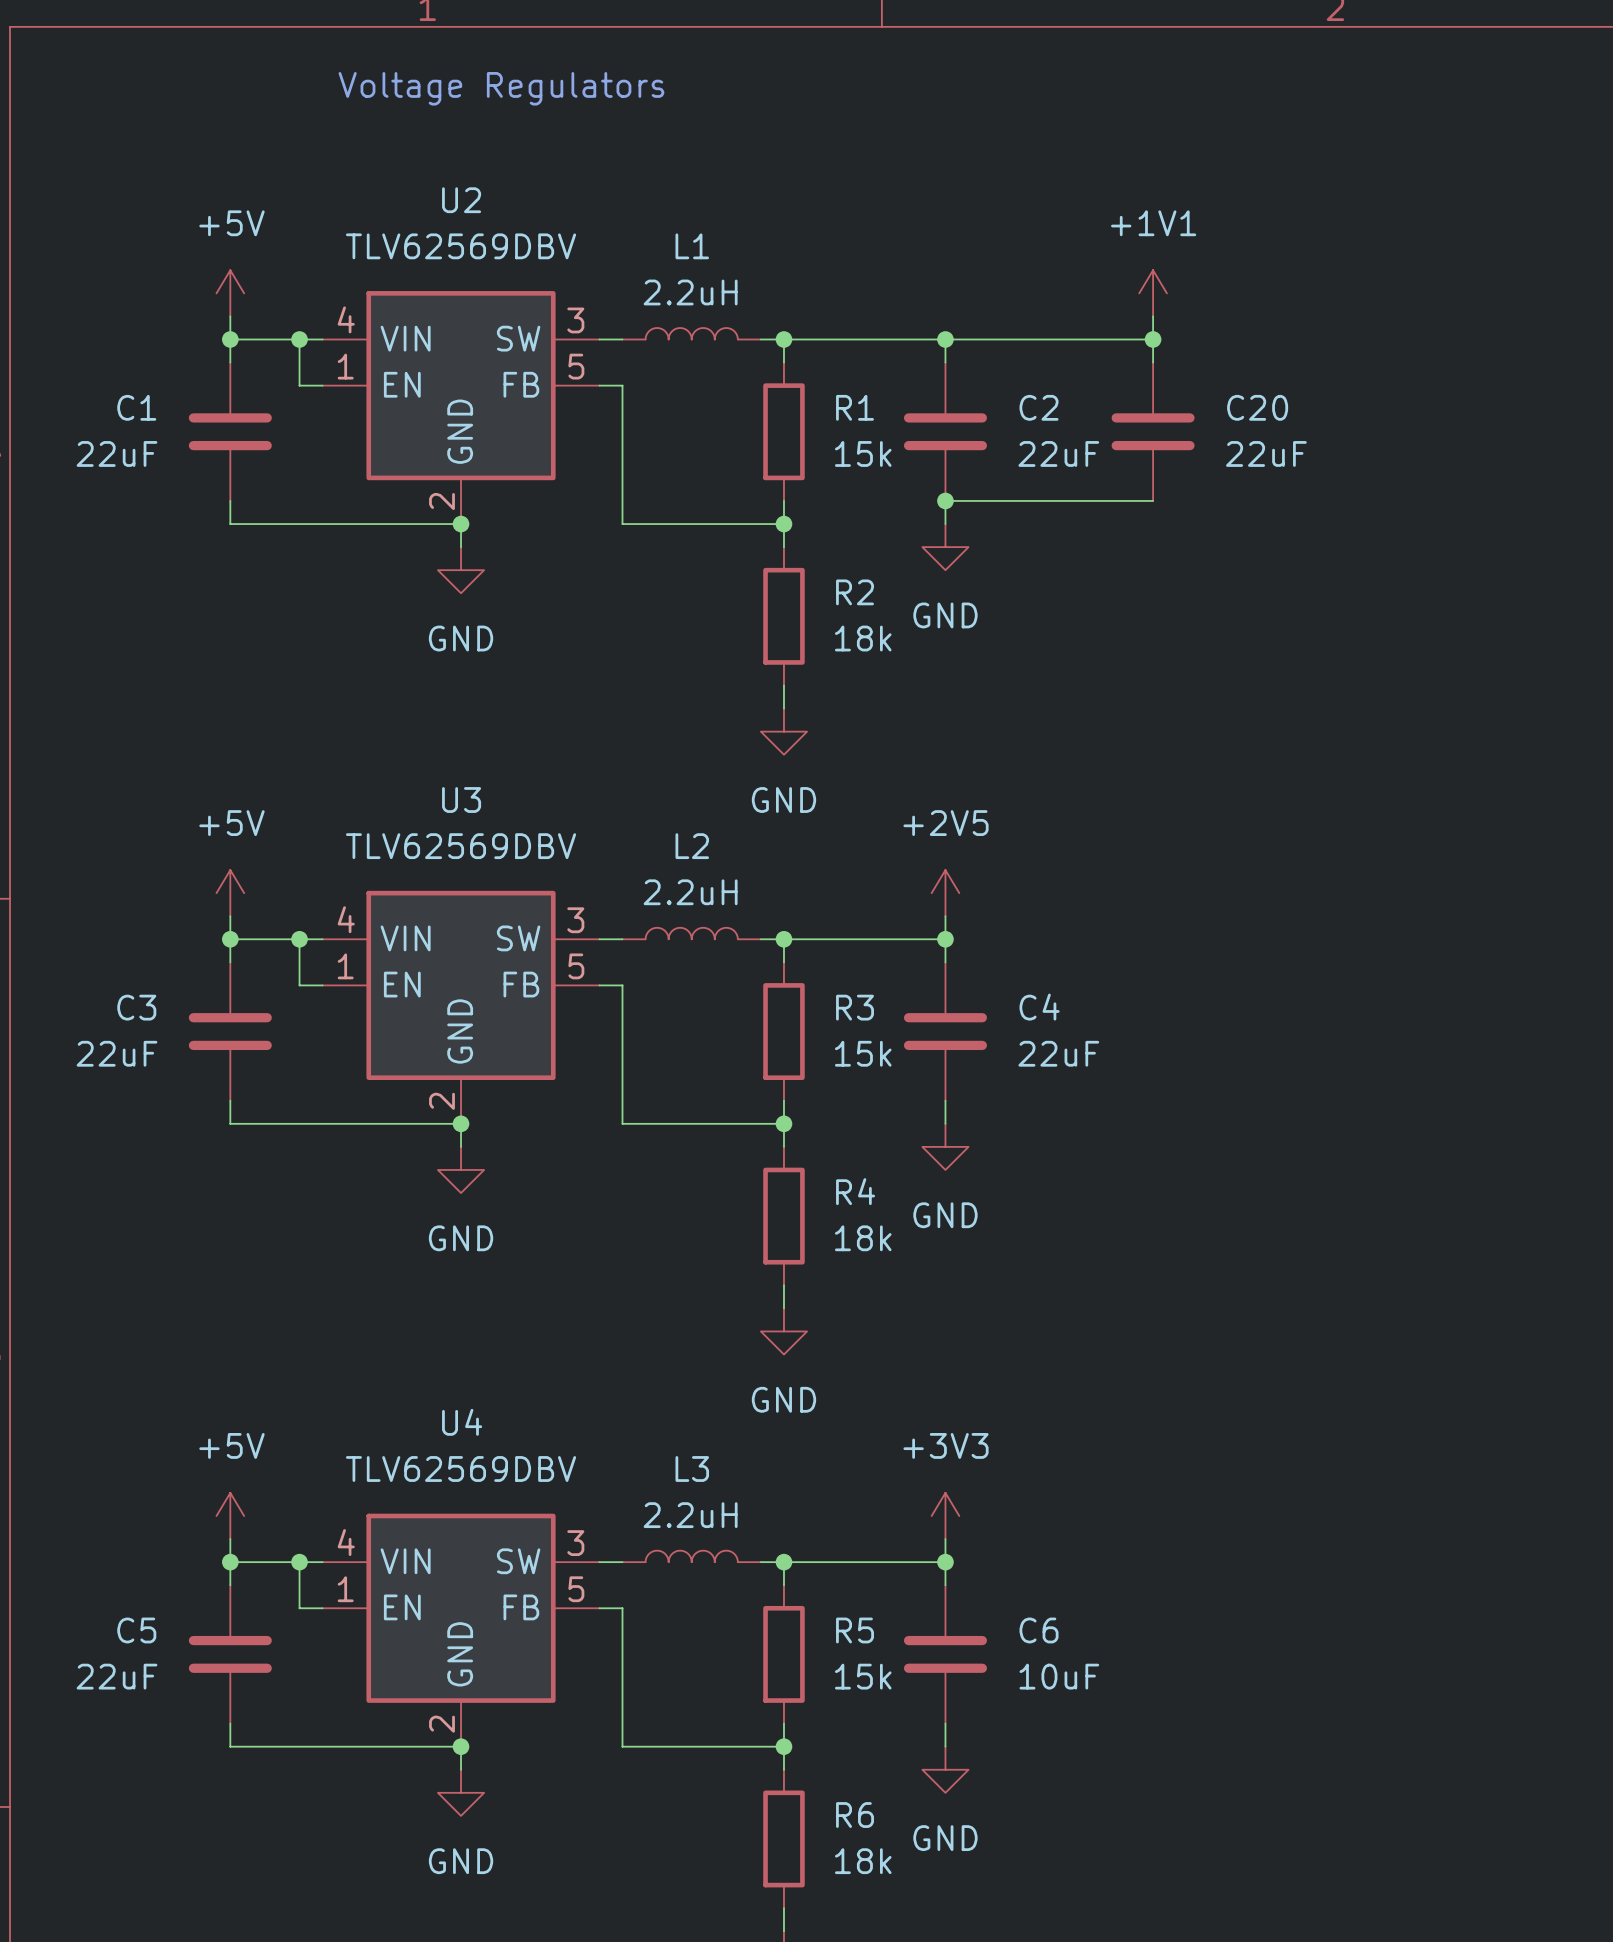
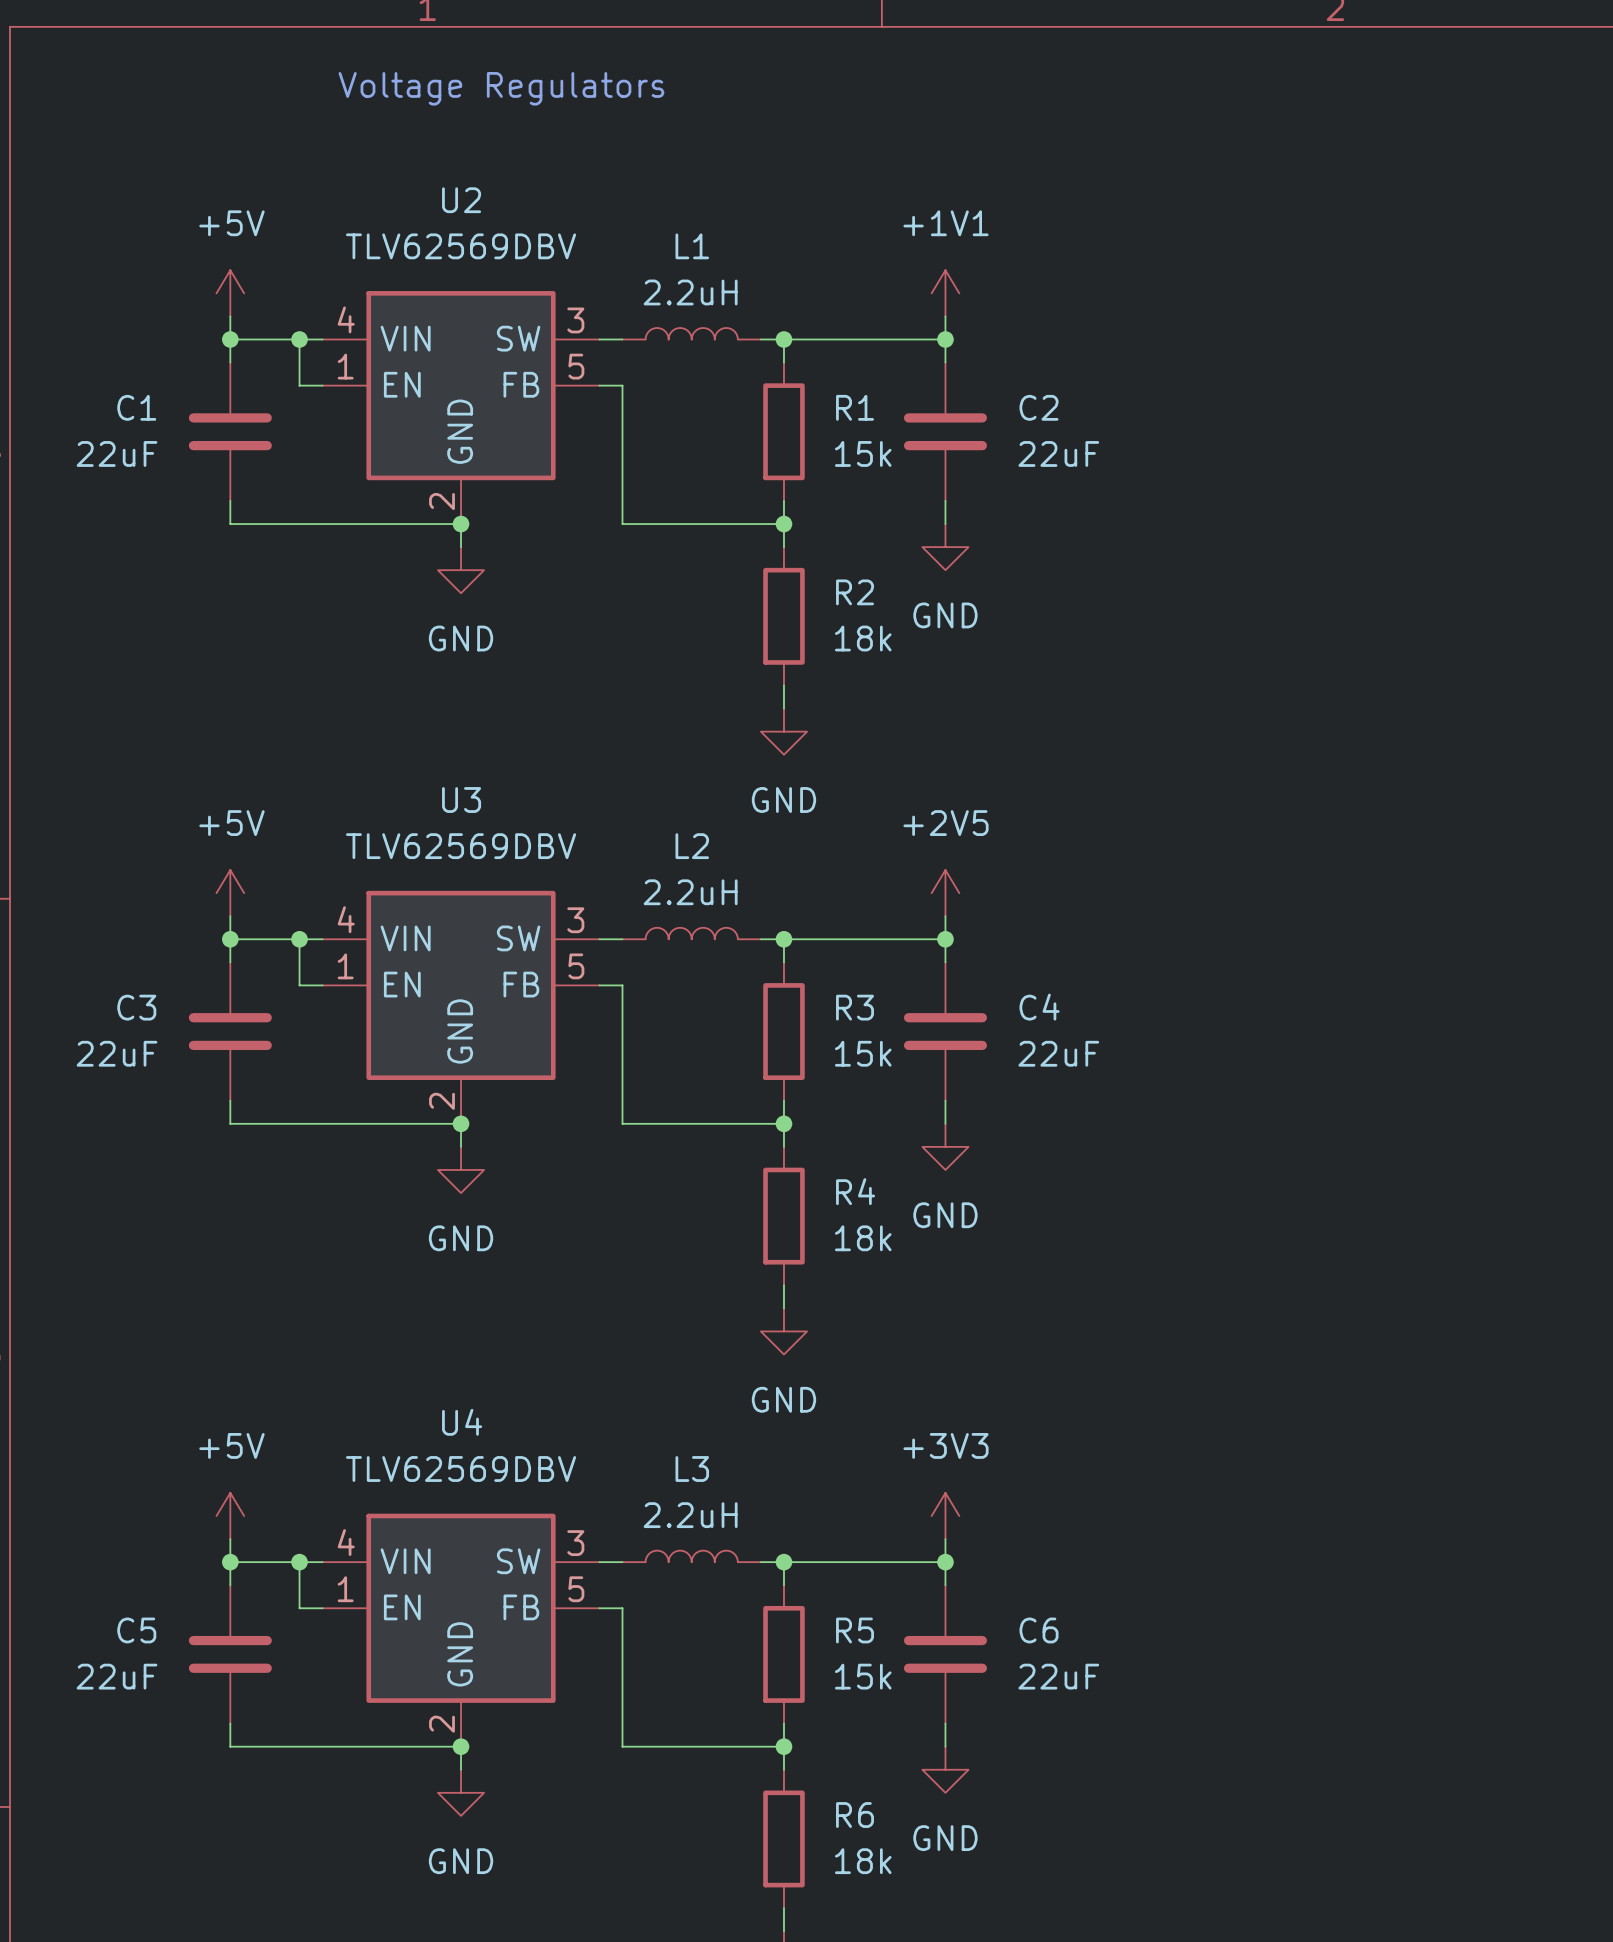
power symbol position: +1V1 (1153, 293) -> +1V1 (945, 293)
wire: (1153, 316) (1153, 362) -> none
wire: (945, 339) (1153, 339) -> (945, 339) (945, 316)
junction: (1153, 339) -> none
C20: 22uF (1153, 431) -> none
wire: (945, 500) (1153, 500) -> none
junction: (945, 500) -> none
C6 value: 10uF (1059, 1676) -> 22uF (1058, 1676)

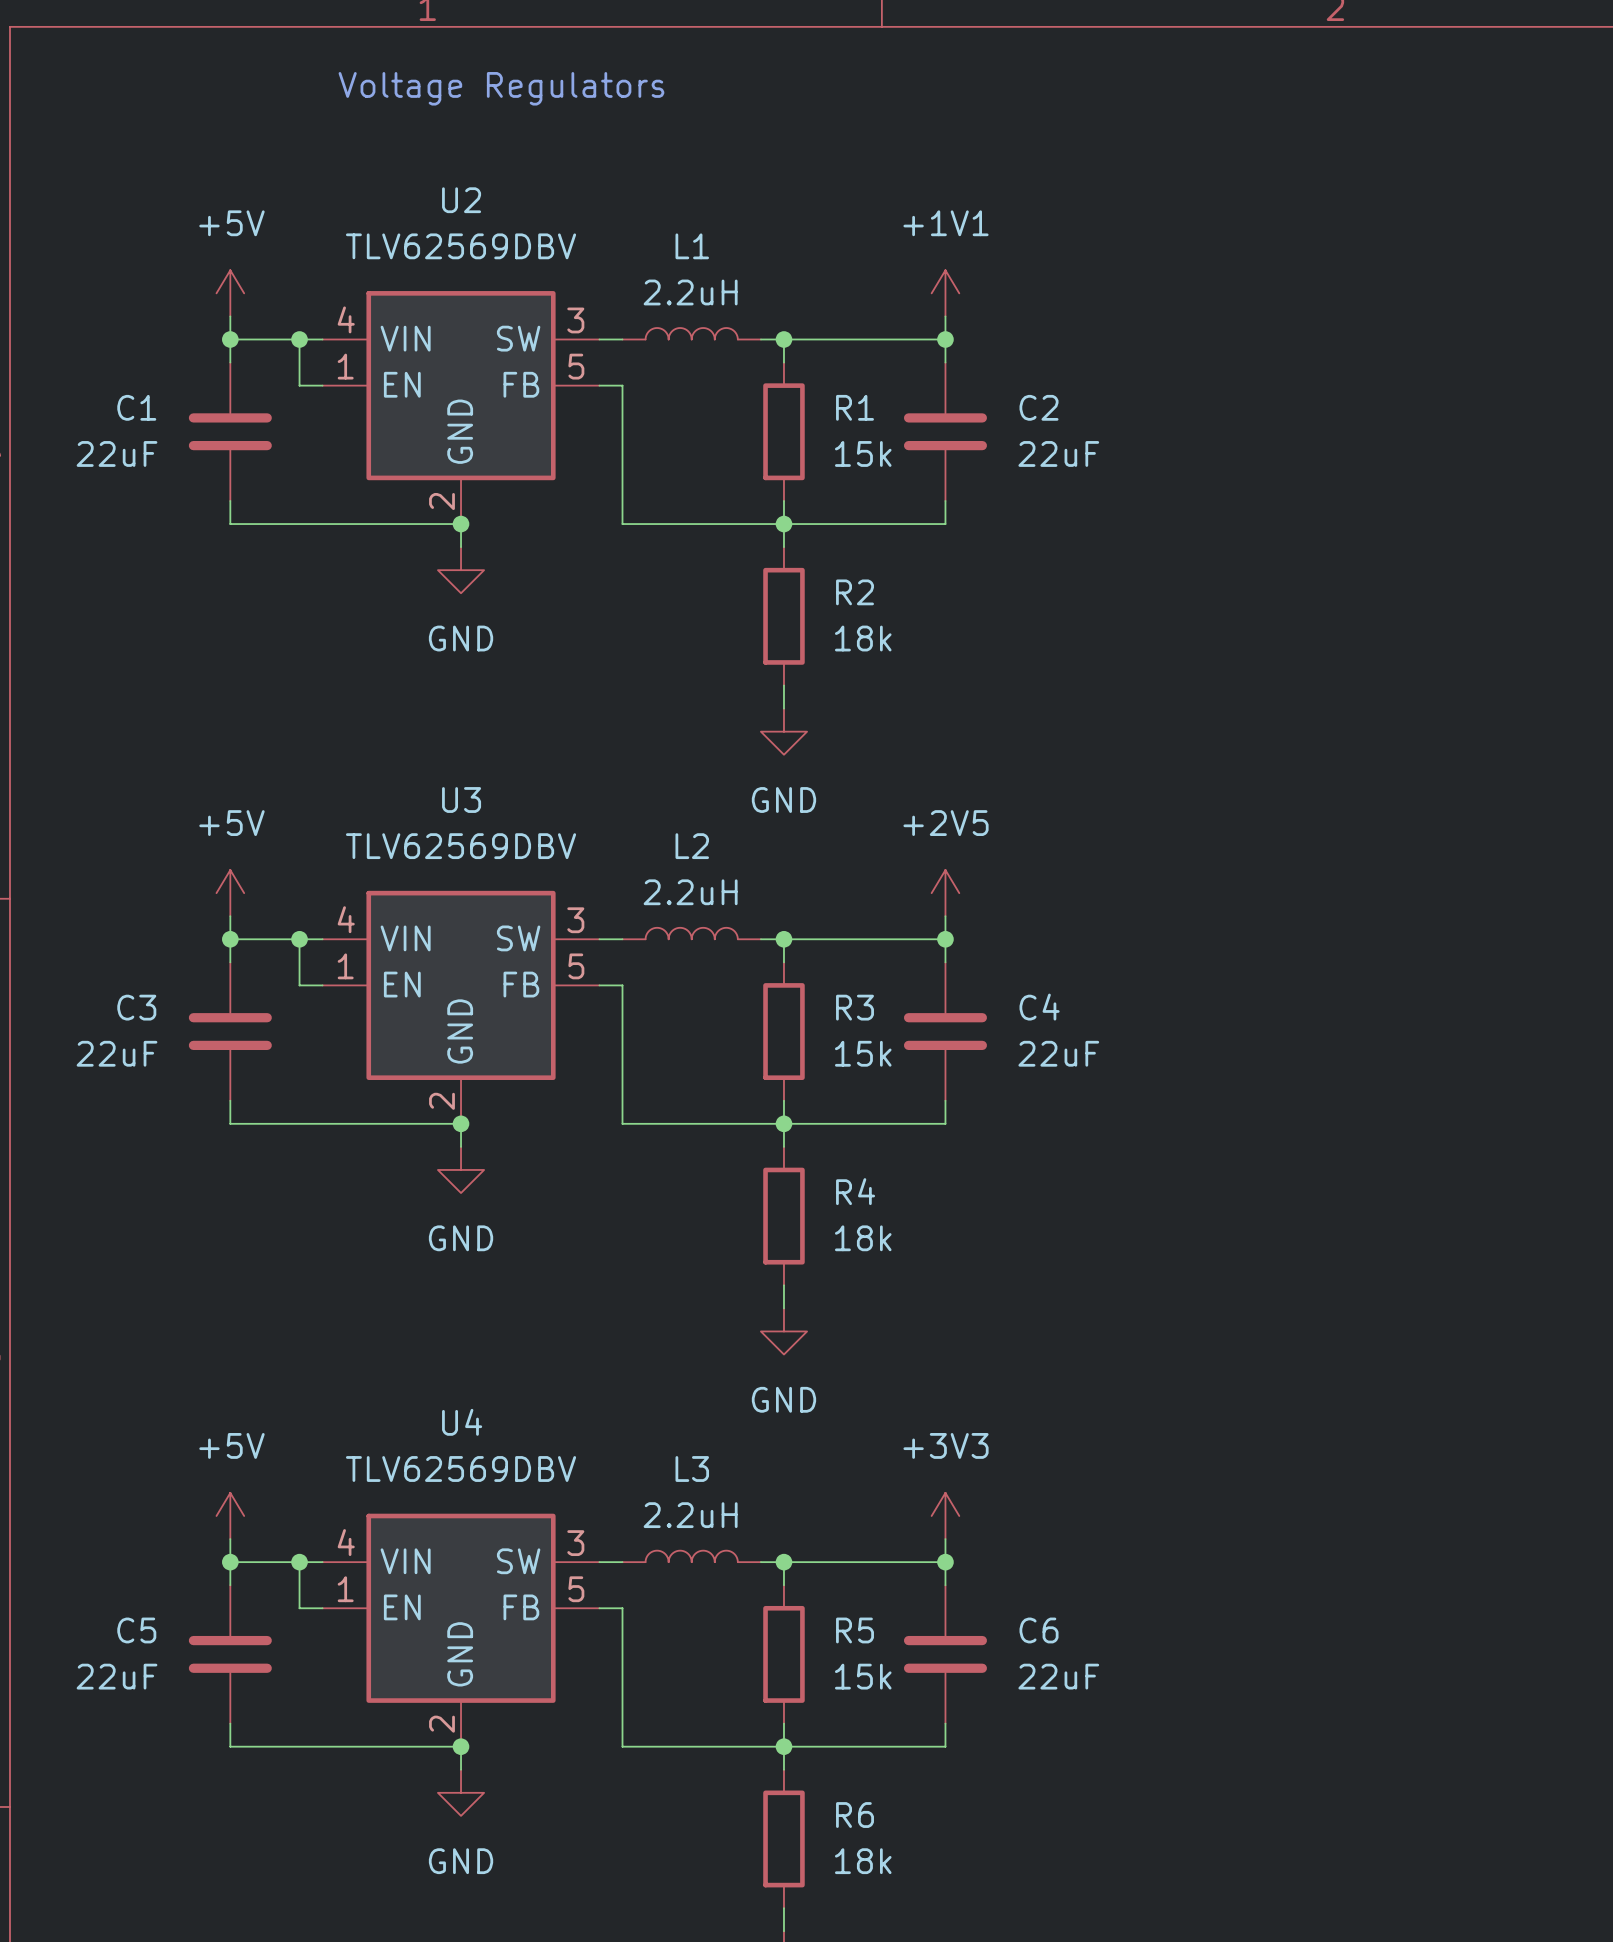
wire: none -> (783, 524) (945, 524)
power symbol: GND (945, 547) -> none
wire: none -> (783, 1123) (945, 1123)
power symbol: GND (945, 1146) -> none
wire: none -> (783, 1746) (945, 1746)
power symbol: GND (945, 1769) -> none

